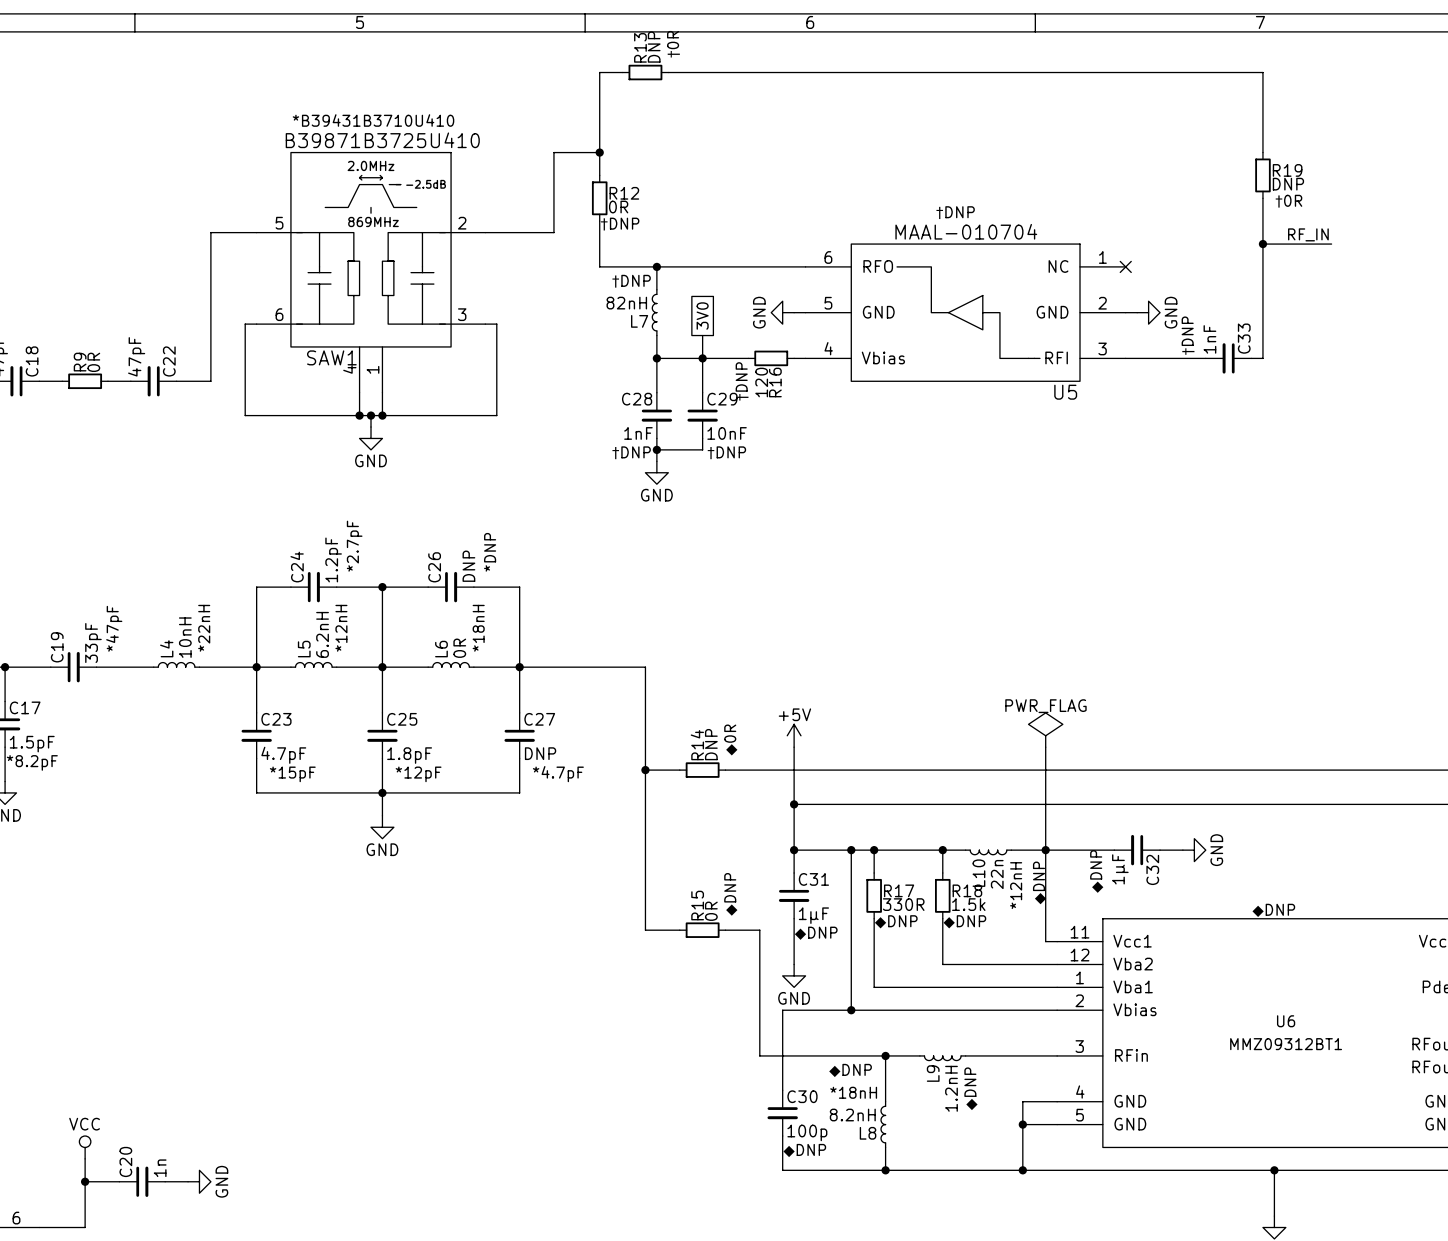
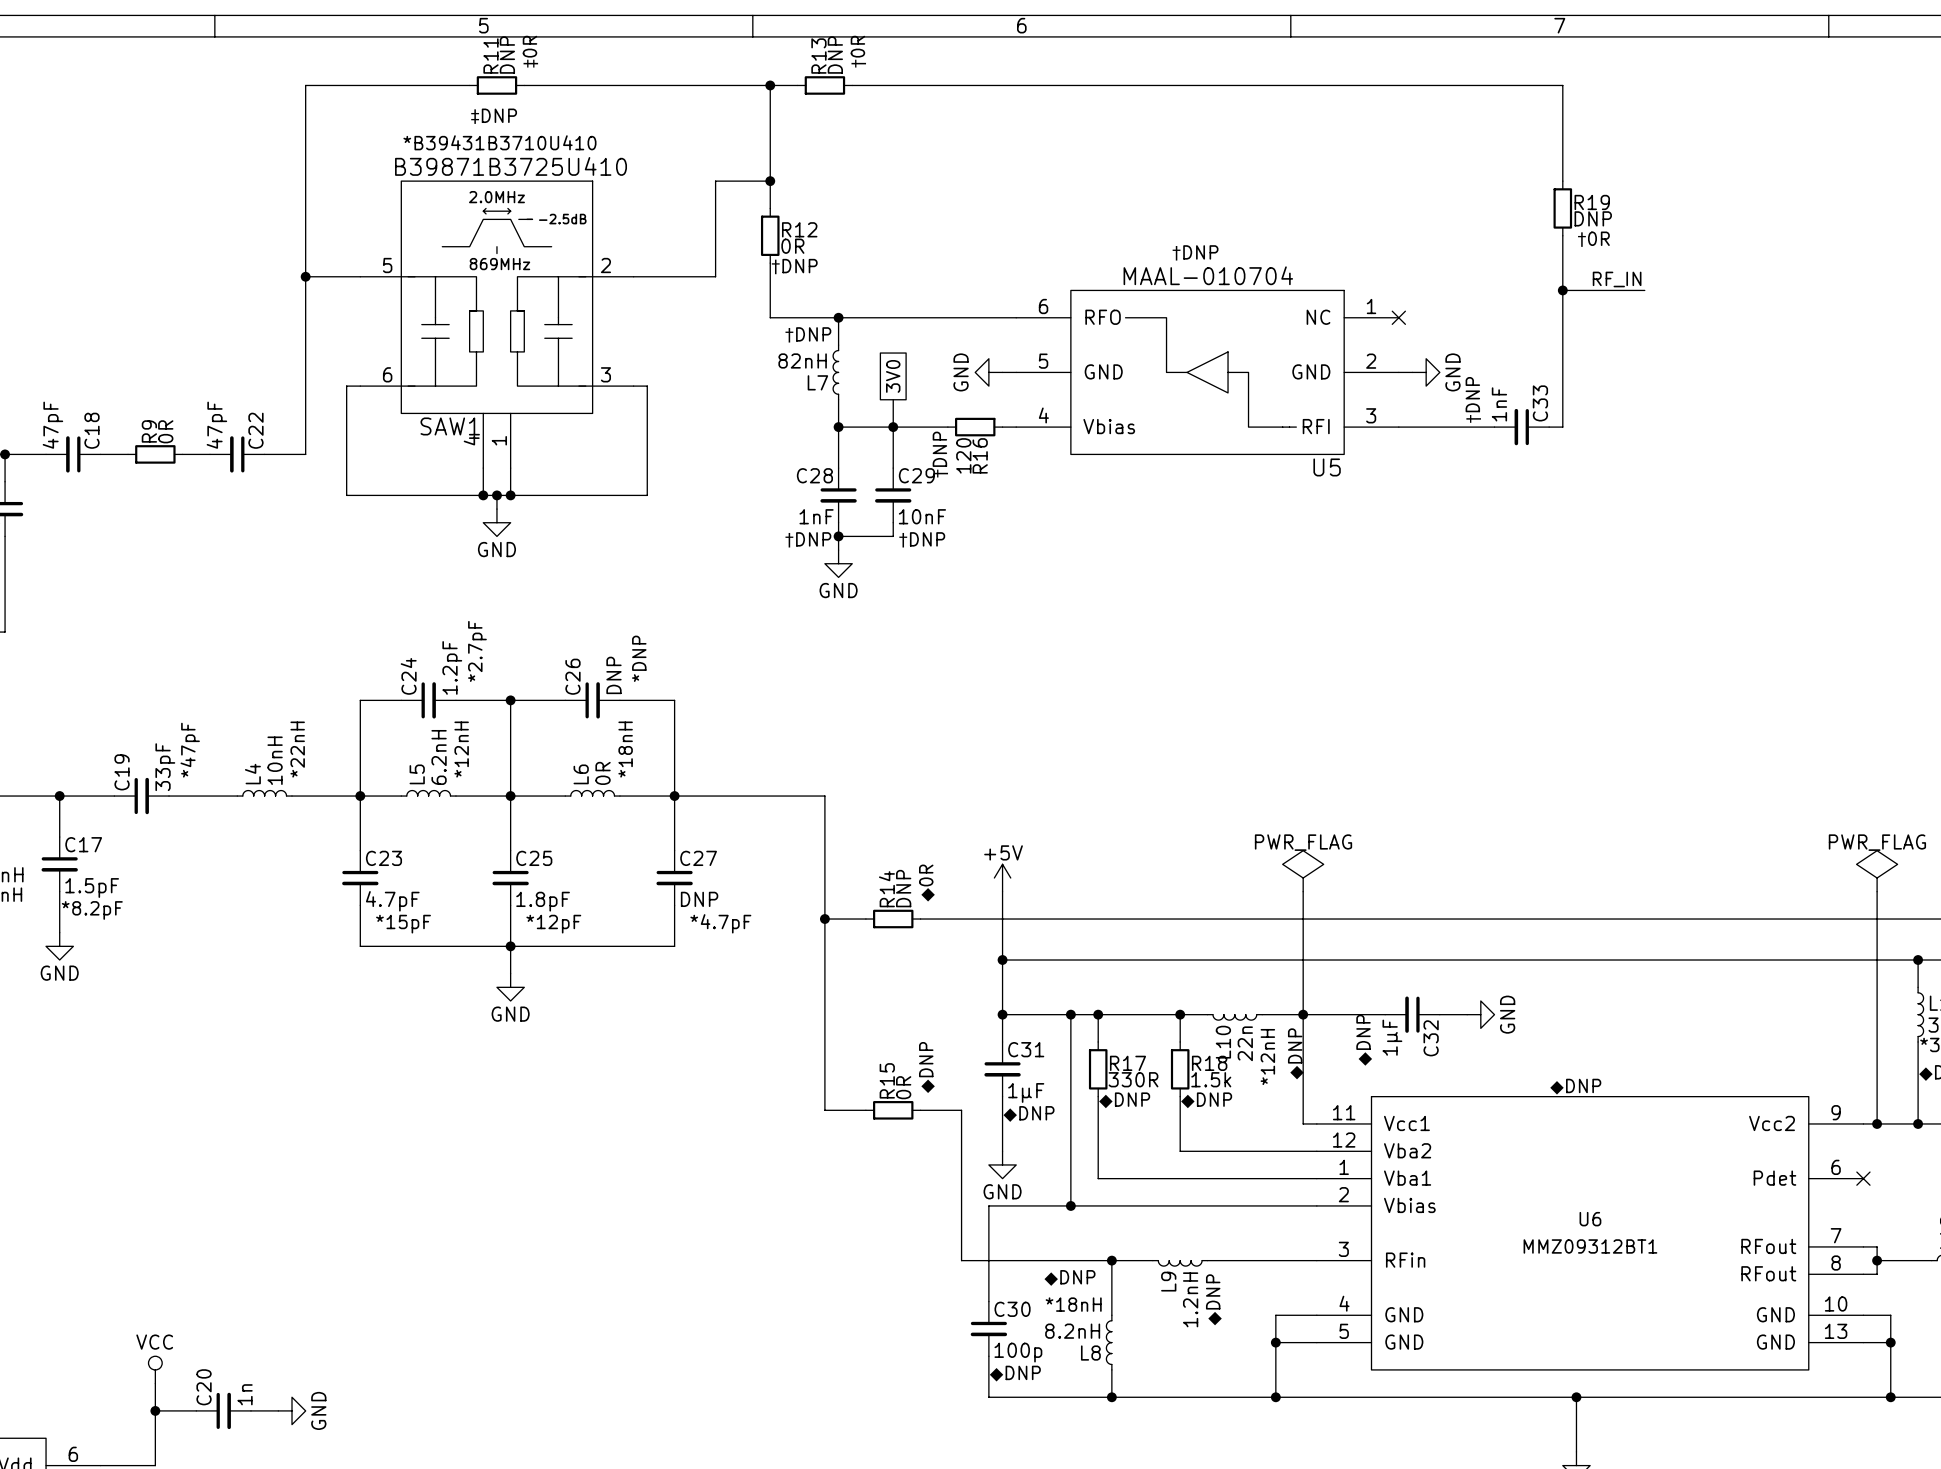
text: none -> ‡0R (530, 52)
wire: none -> (469, 85) (305, 85) (305, 276)
R11: none -> DNP (496, 85)
wire: none -> (524, 85) (770, 85)
junction: none -> (770, 85)
text: none -> ‡DNP (493, 116)
junction: none -> (305, 276)

